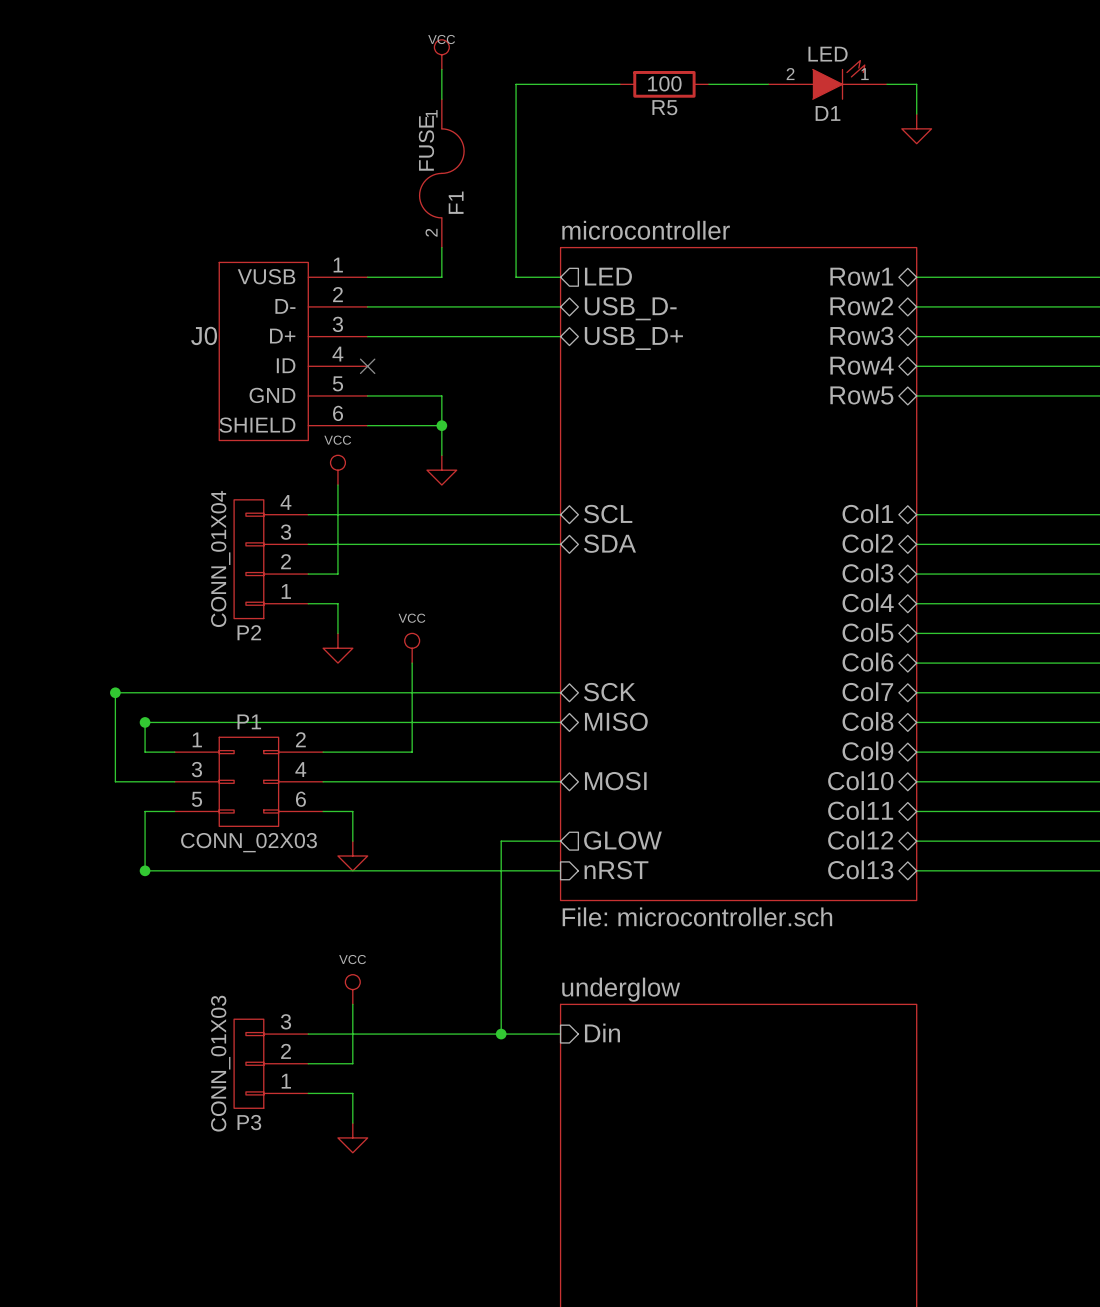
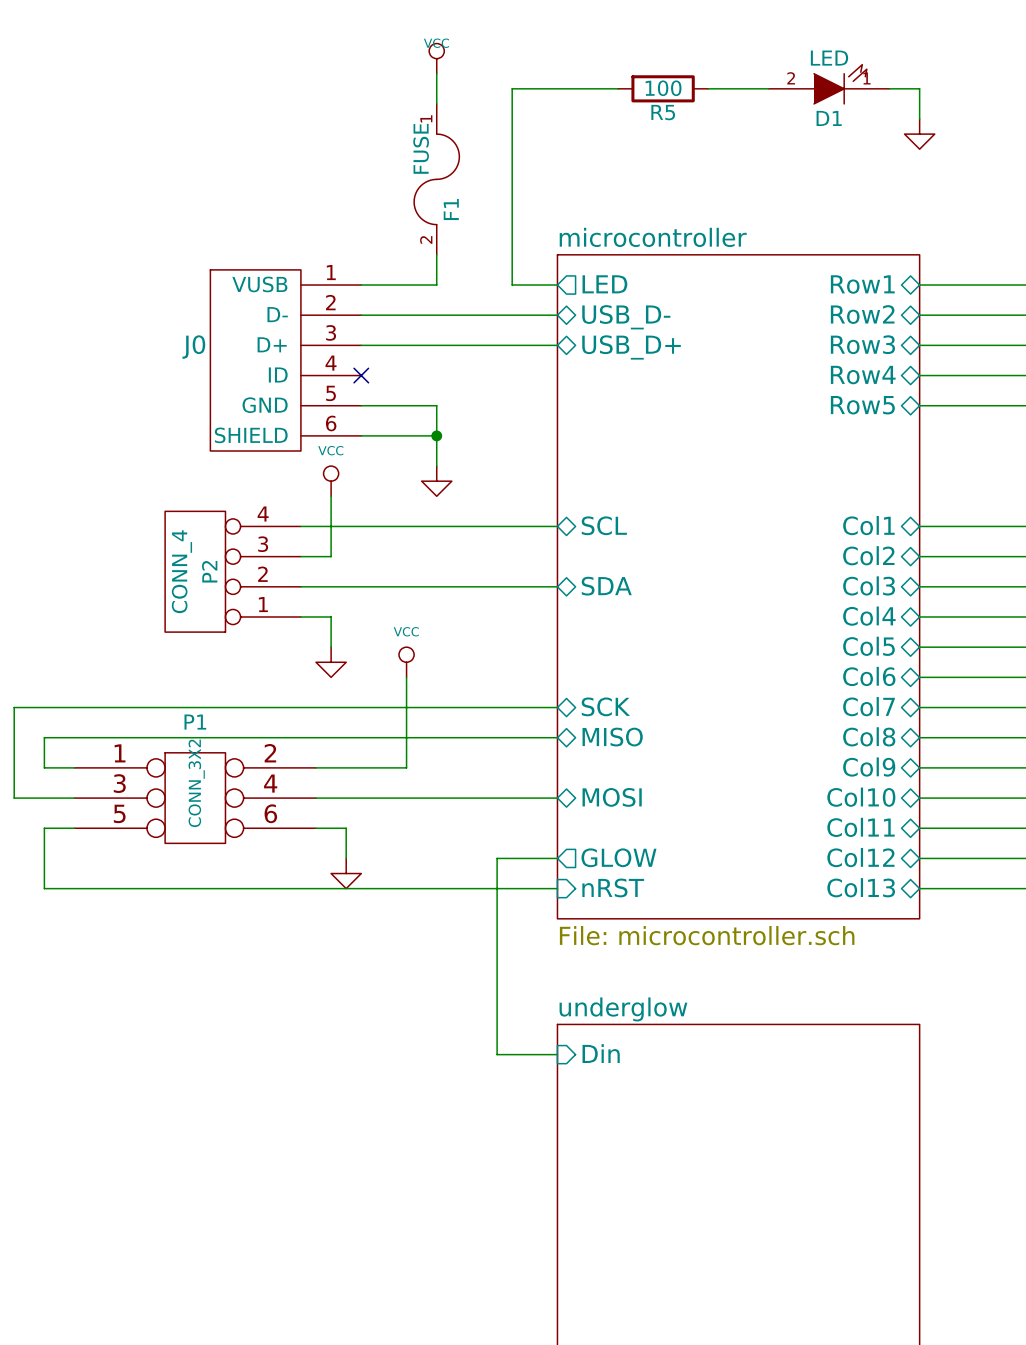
P2 symbol: [234, 499, 309, 619] -> [165, 511, 301, 633]
sheet pin position: SDA (609, 543) -> SDA (606, 586)
wire: (560, 544) (337, 544) (337, 574) -> (557, 586) (331, 586)
P2 value: CONN_01X04 (220, 558) -> CONN_4 (181, 571)
P2 name position: P2 (249, 632) -> P2 (209, 571)
wire: (115, 692) (115, 781) (174, 781) -> (104, 707) (14, 707) (14, 798) (74, 798)
junction: (115, 692) -> none
wire: (145, 722) (145, 752) (174, 752) -> (134, 737) (44, 737) (44, 767) (74, 767)
junction: (145, 722) -> none
P1 symbol: [174, 737, 324, 827] -> [74, 752, 317, 844]
wire: (174, 811) (145, 811) (145, 870) -> (74, 828) (44, 828) (44, 888) (134, 888)
P1 value: CONN_02X03 (249, 842) -> CONN_3X2 (196, 783)
junction: (145, 870) -> none
power symbol: VCC (352, 989) -> none
wire: (352, 1004) (352, 1063) (308, 1063) -> none
wire: (308, 1034) (501, 1034) -> none
junction: (501, 1034) -> none
P3: CONN_01X03 (271, 1063) -> none
wire: (308, 1093) (352, 1093) (352, 1123) -> none
power symbol: (352, 1137) -> none

